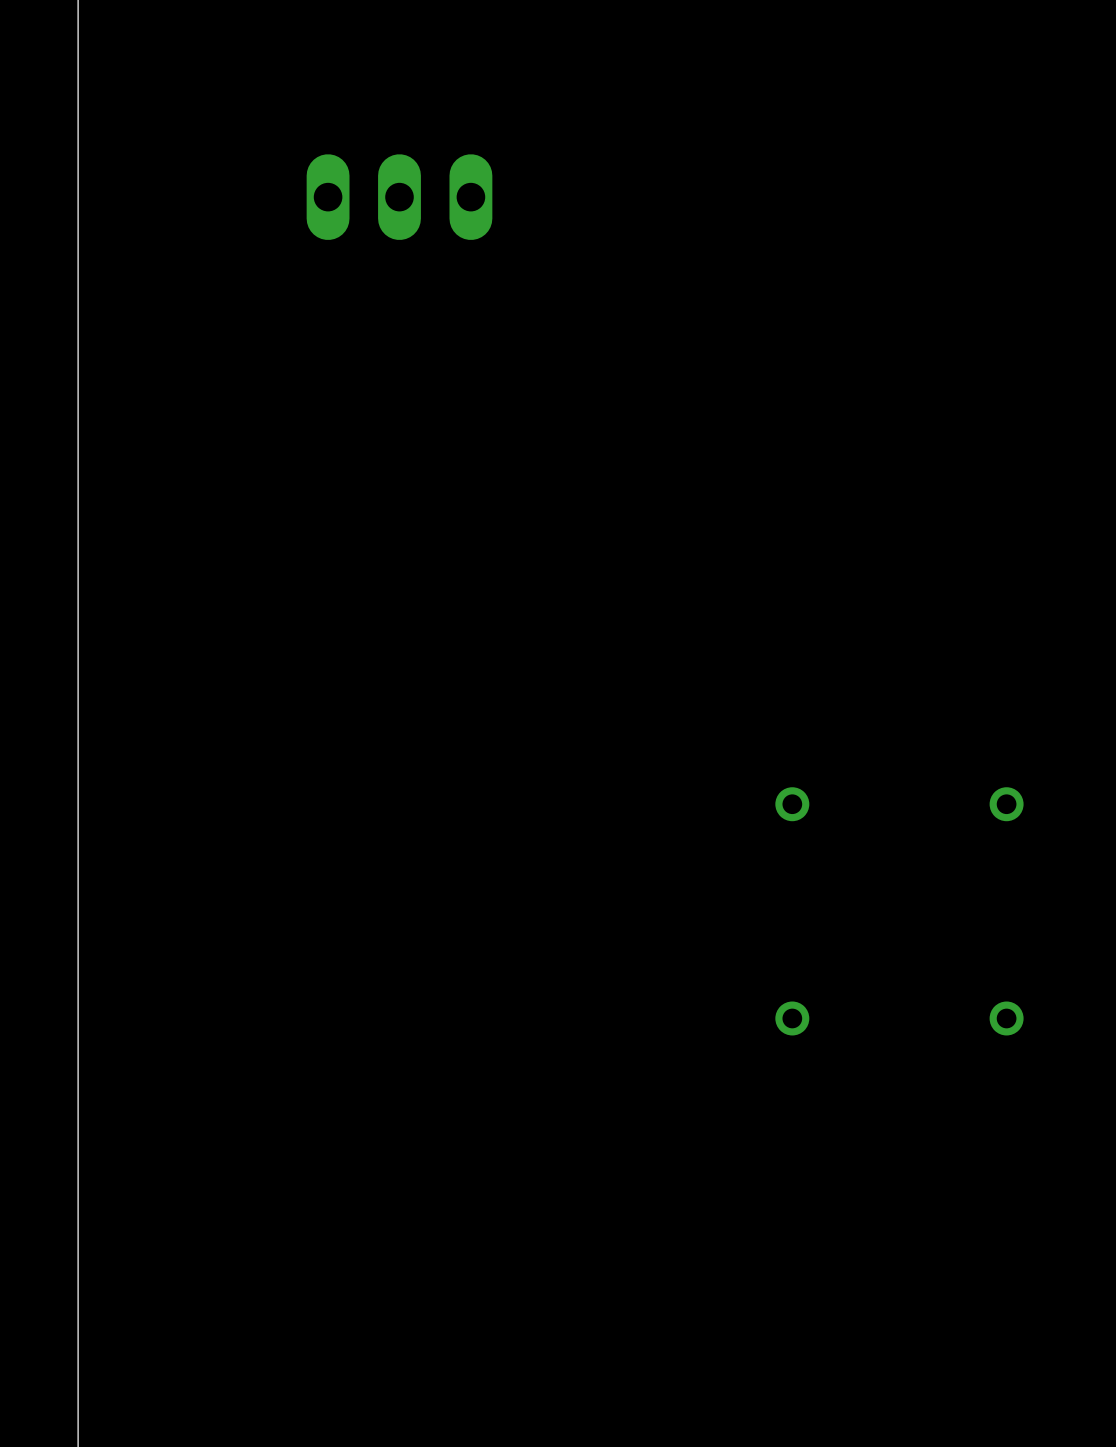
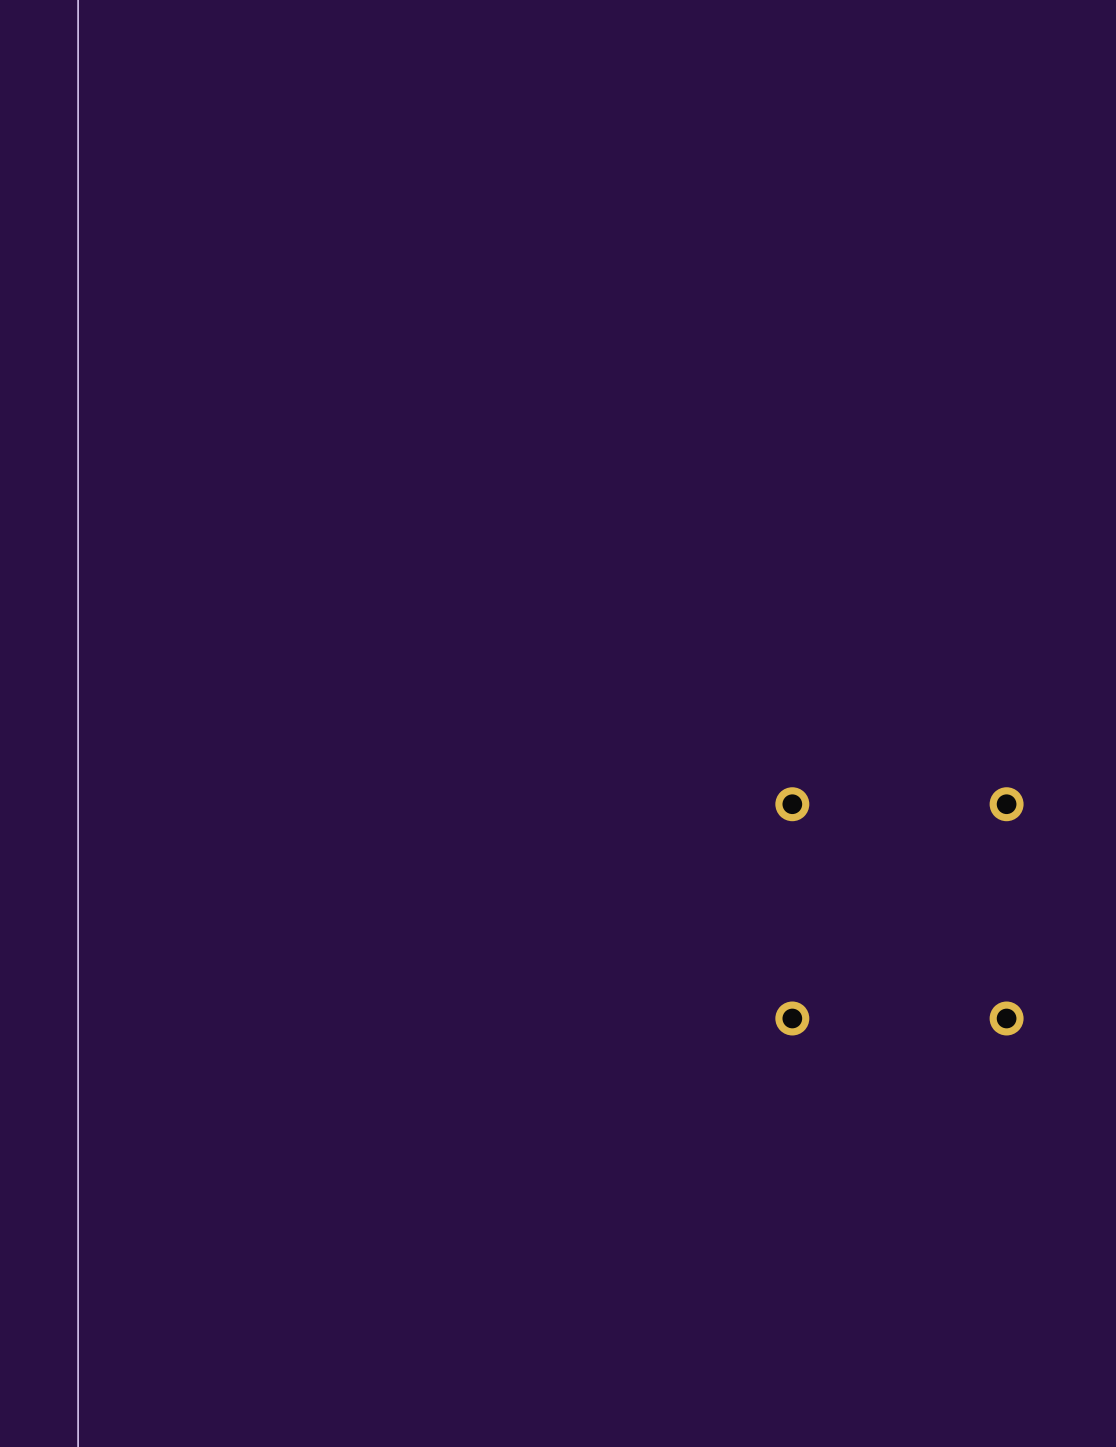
part: (399, 197) -> none

